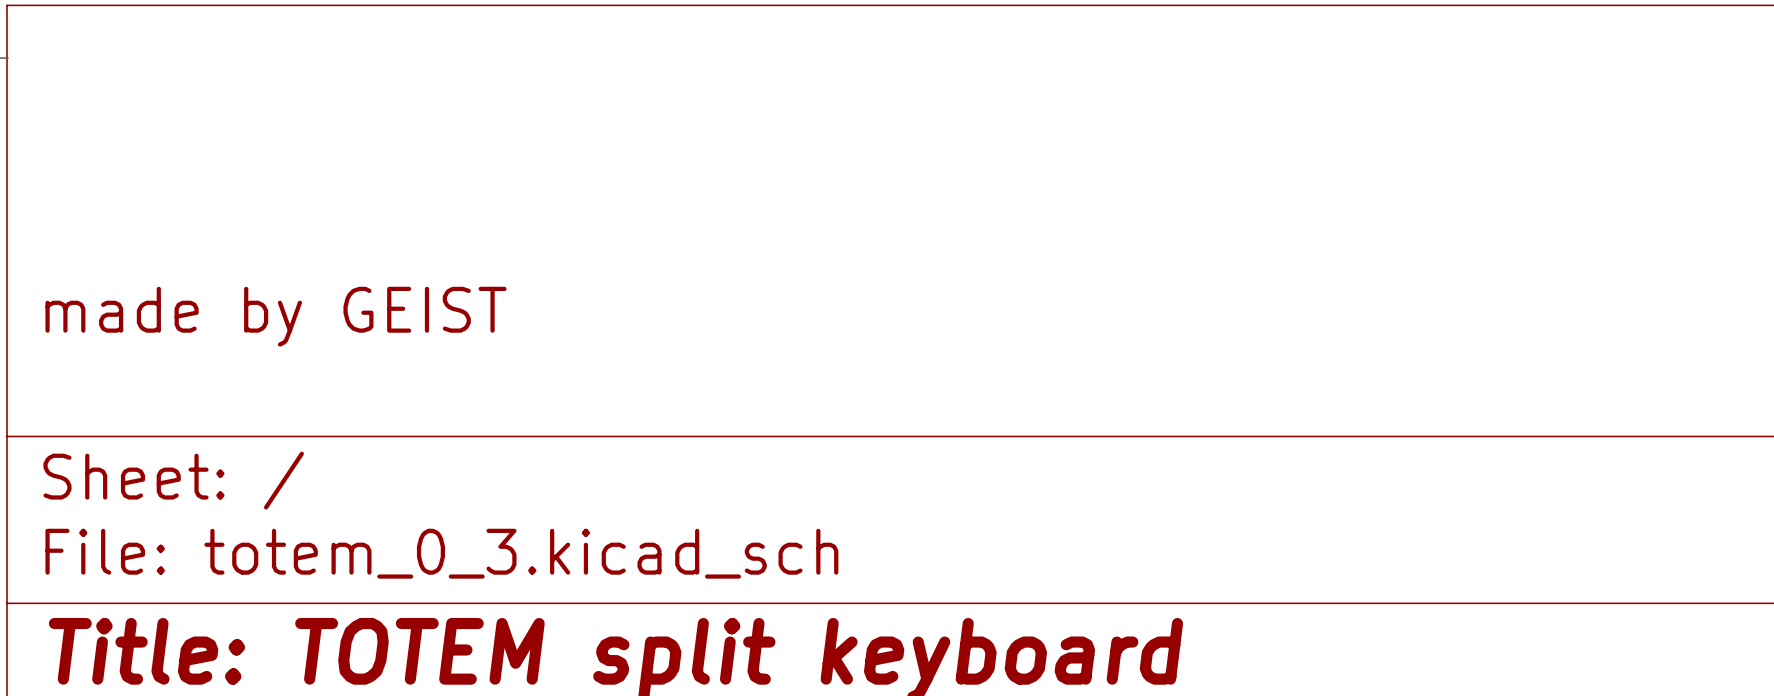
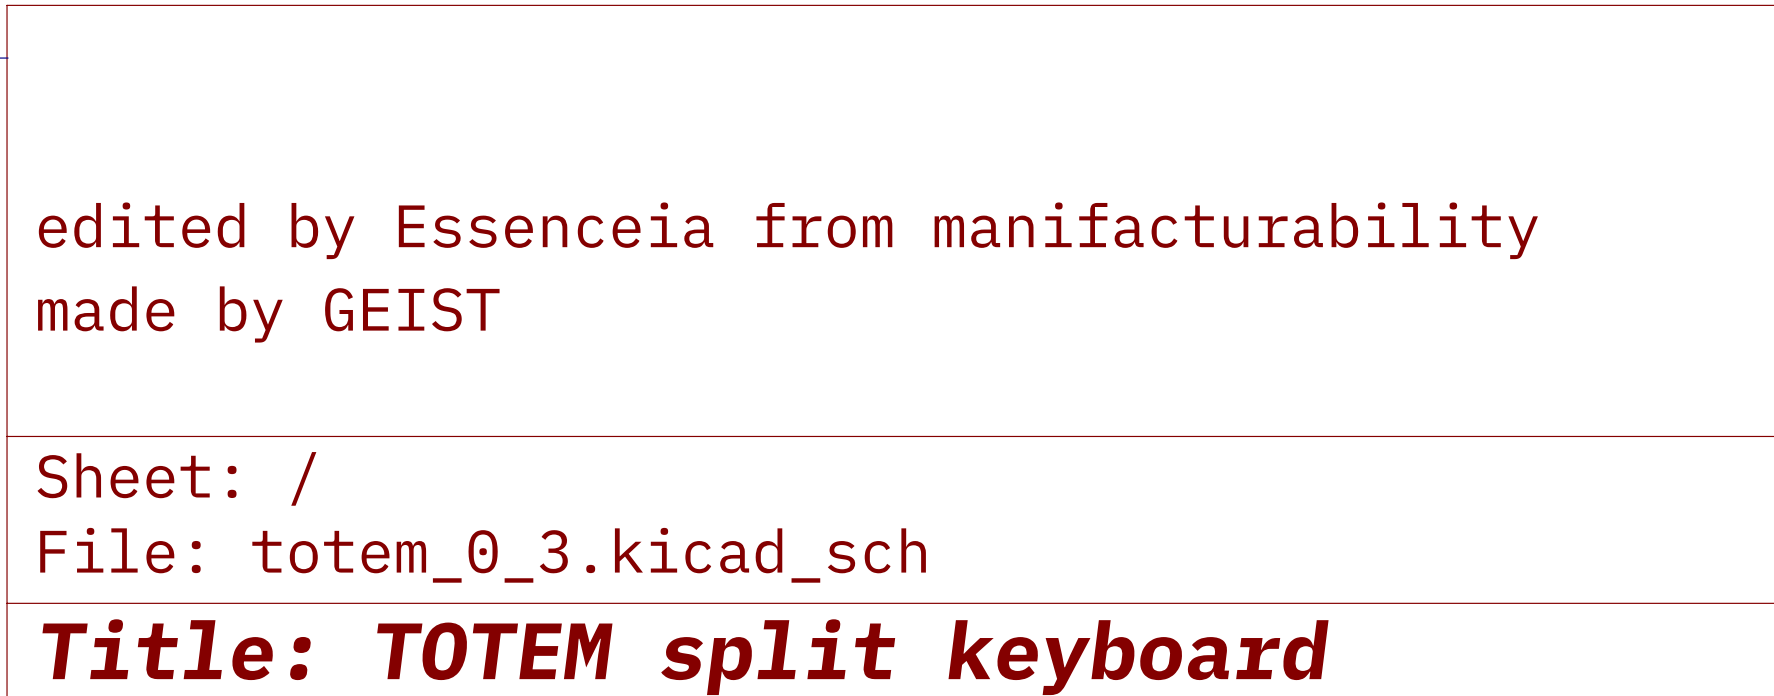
title block: none -> edited by Essenceia from manifacturability (788, 230)

